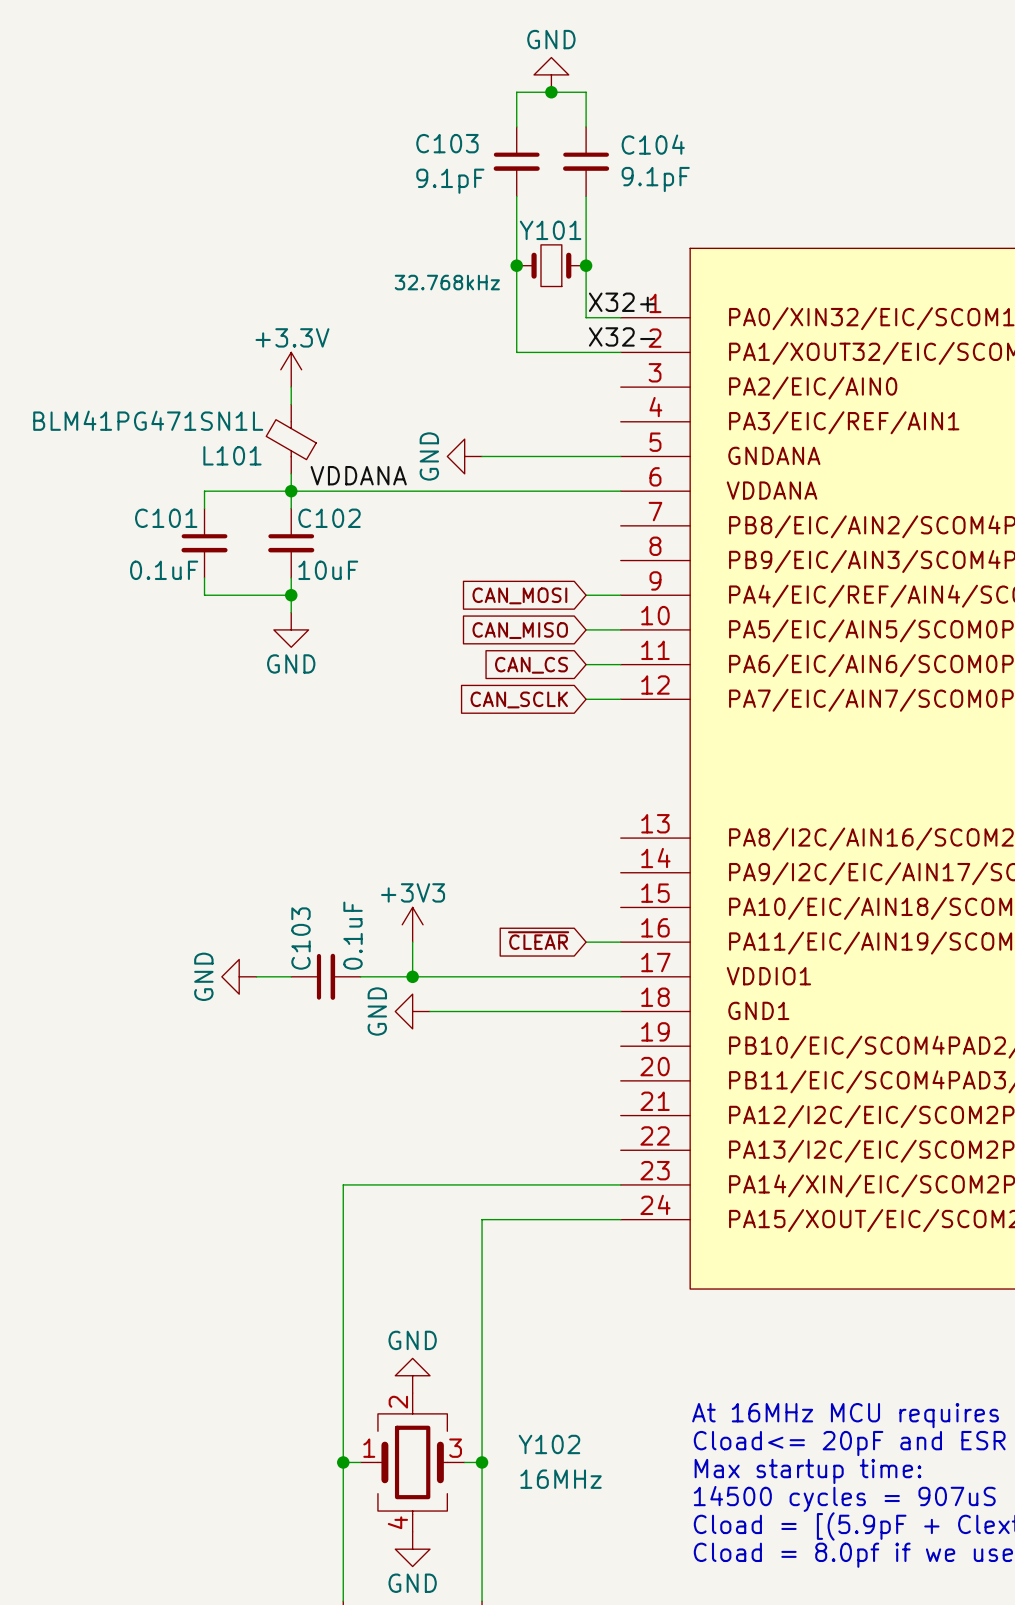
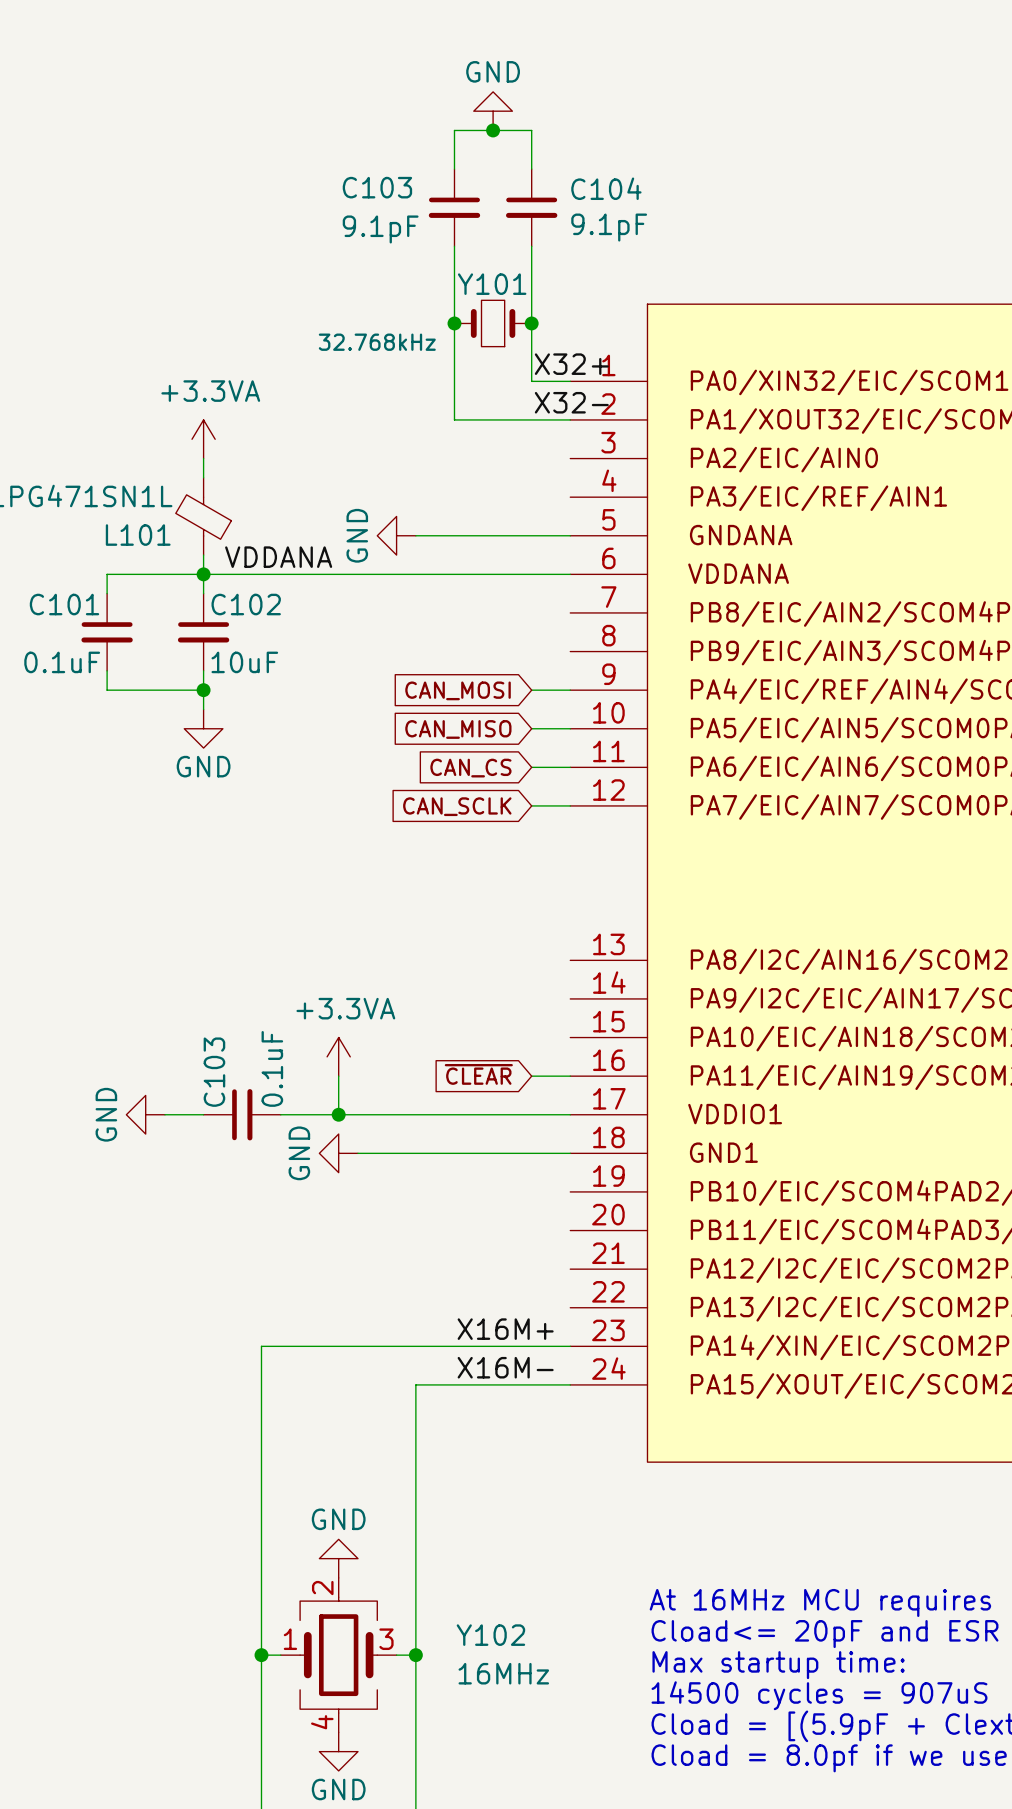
power symbol: +3.3V (291, 369) -> +3.3VA (203, 439)
power symbol: +3V3 (412, 924) -> +3.3VA (338, 1056)
label: none -> X16M+ (505, 1329)
label: none -> X16M- (505, 1367)

